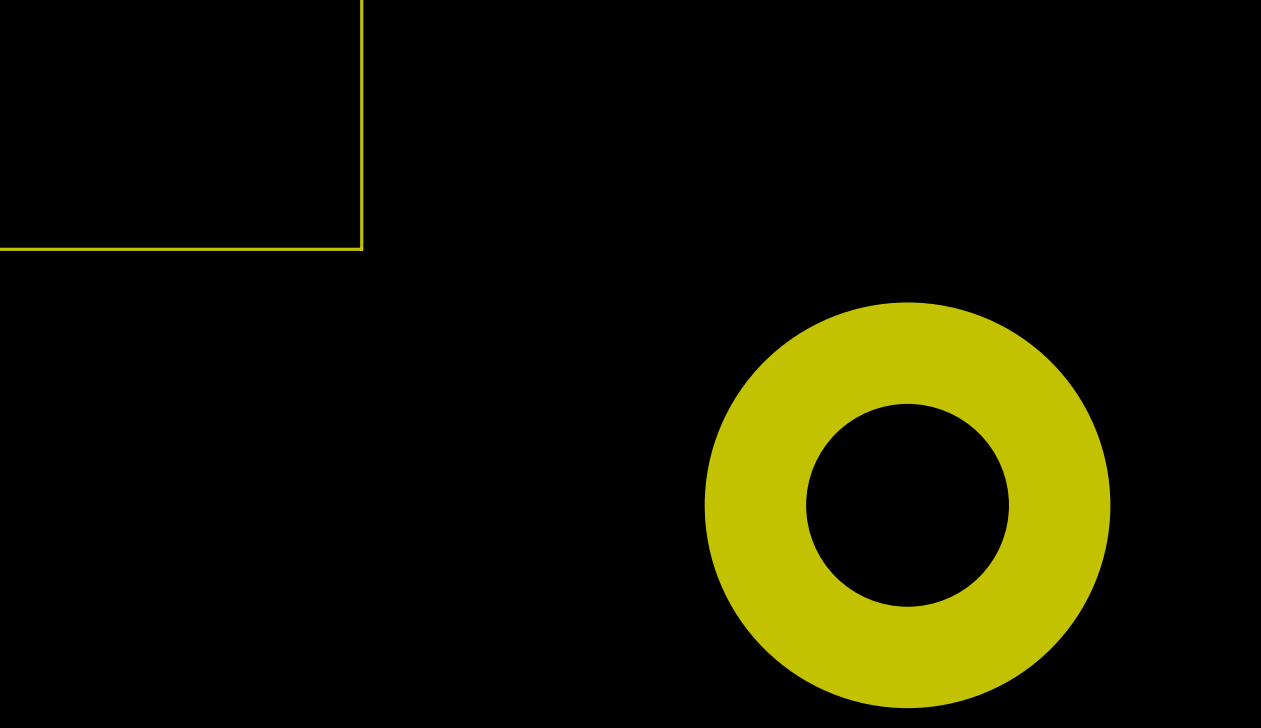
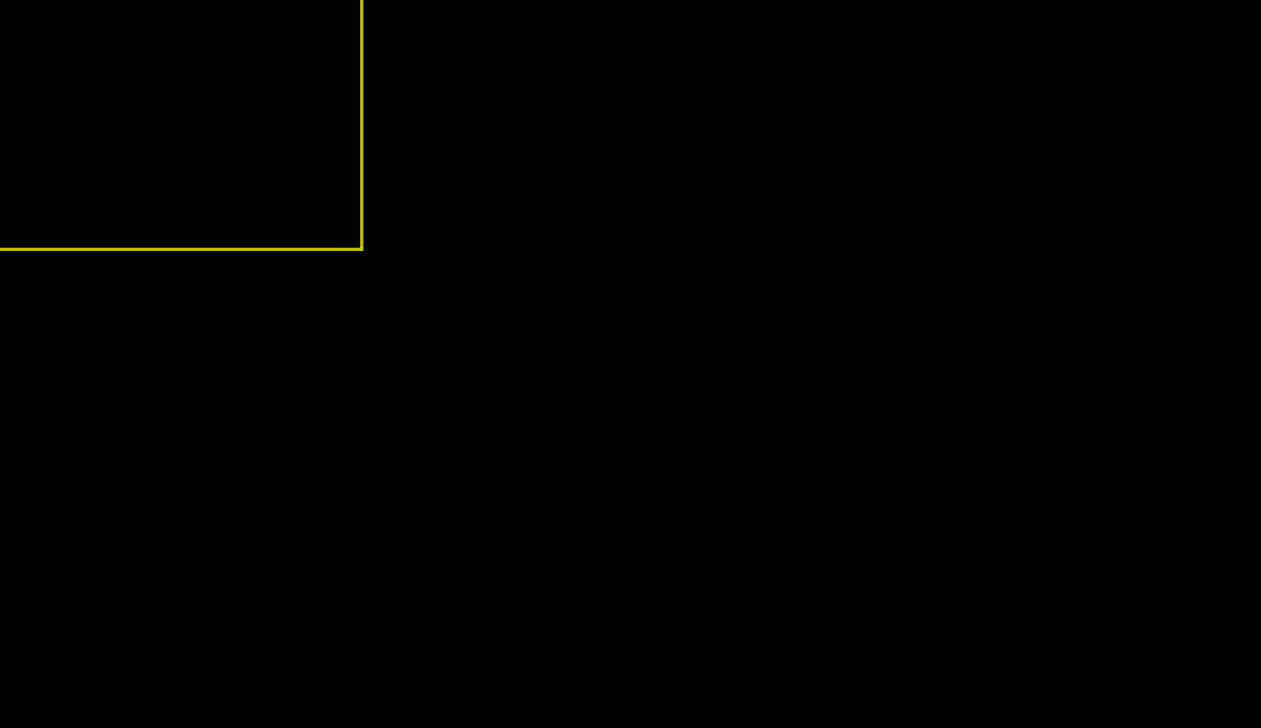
part: (907, 505) -> none

